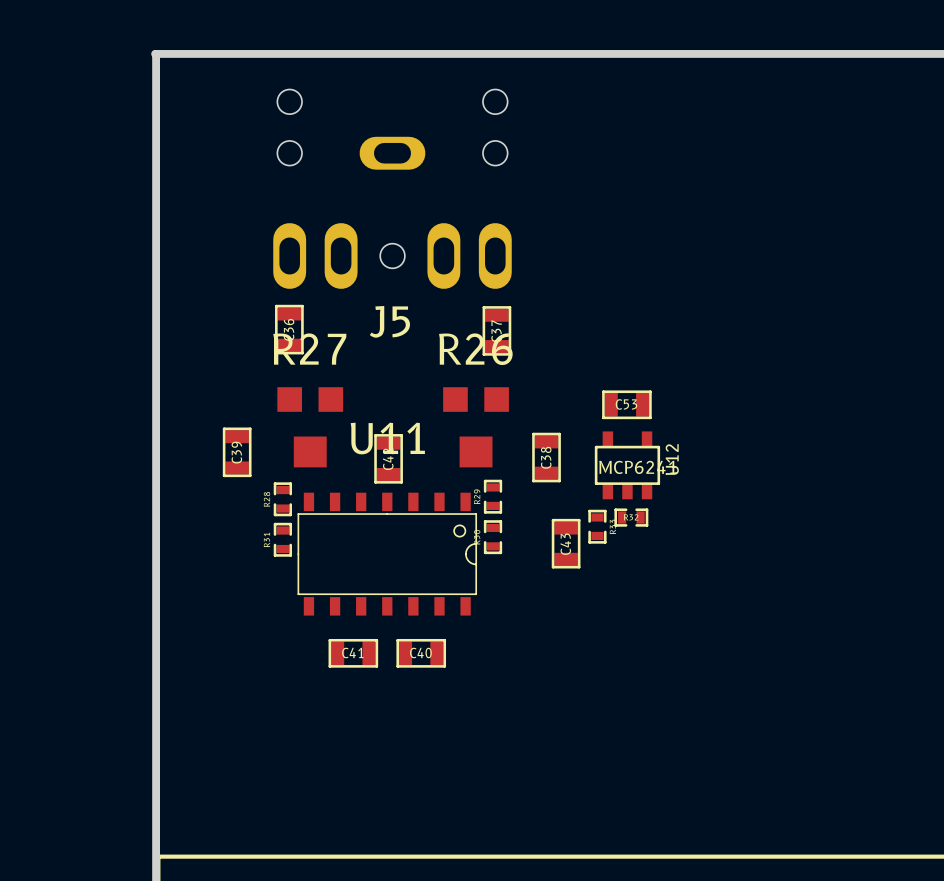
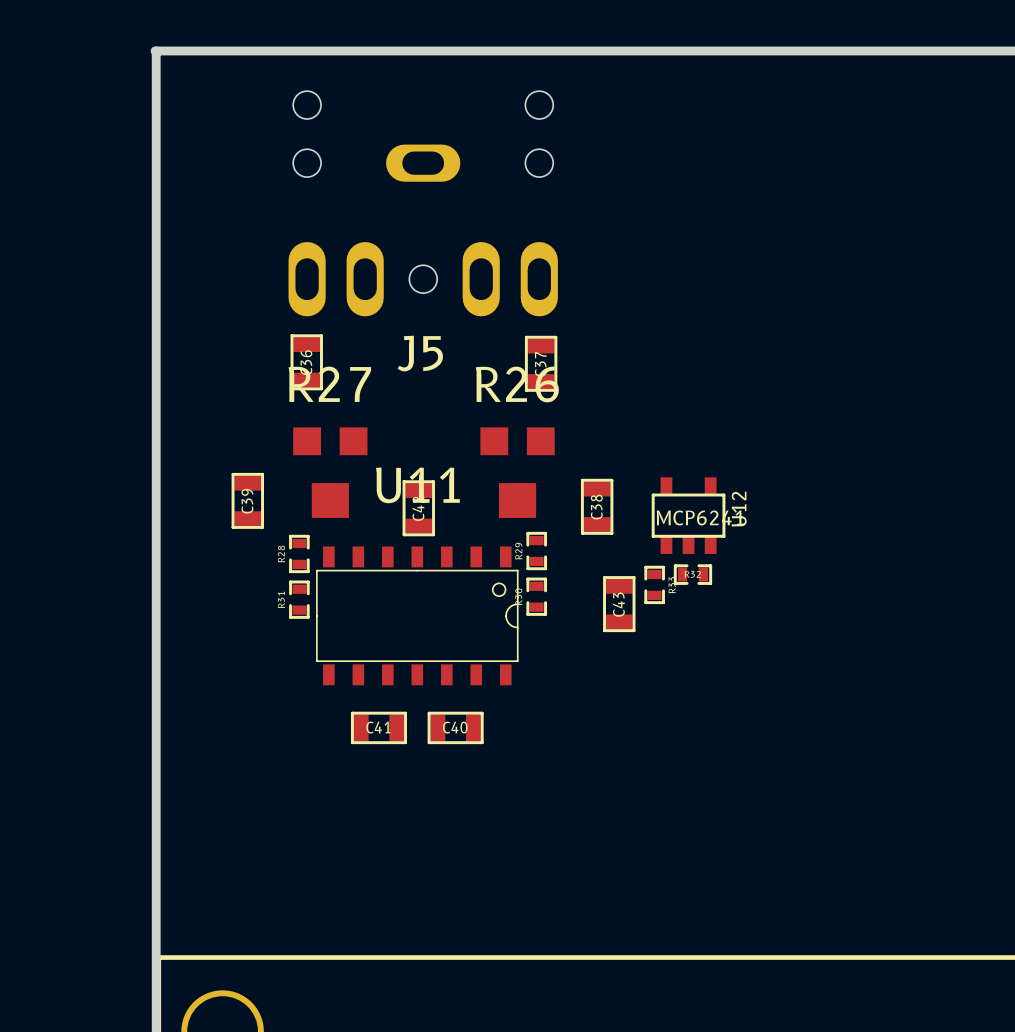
C53: (626, 404) -> none

